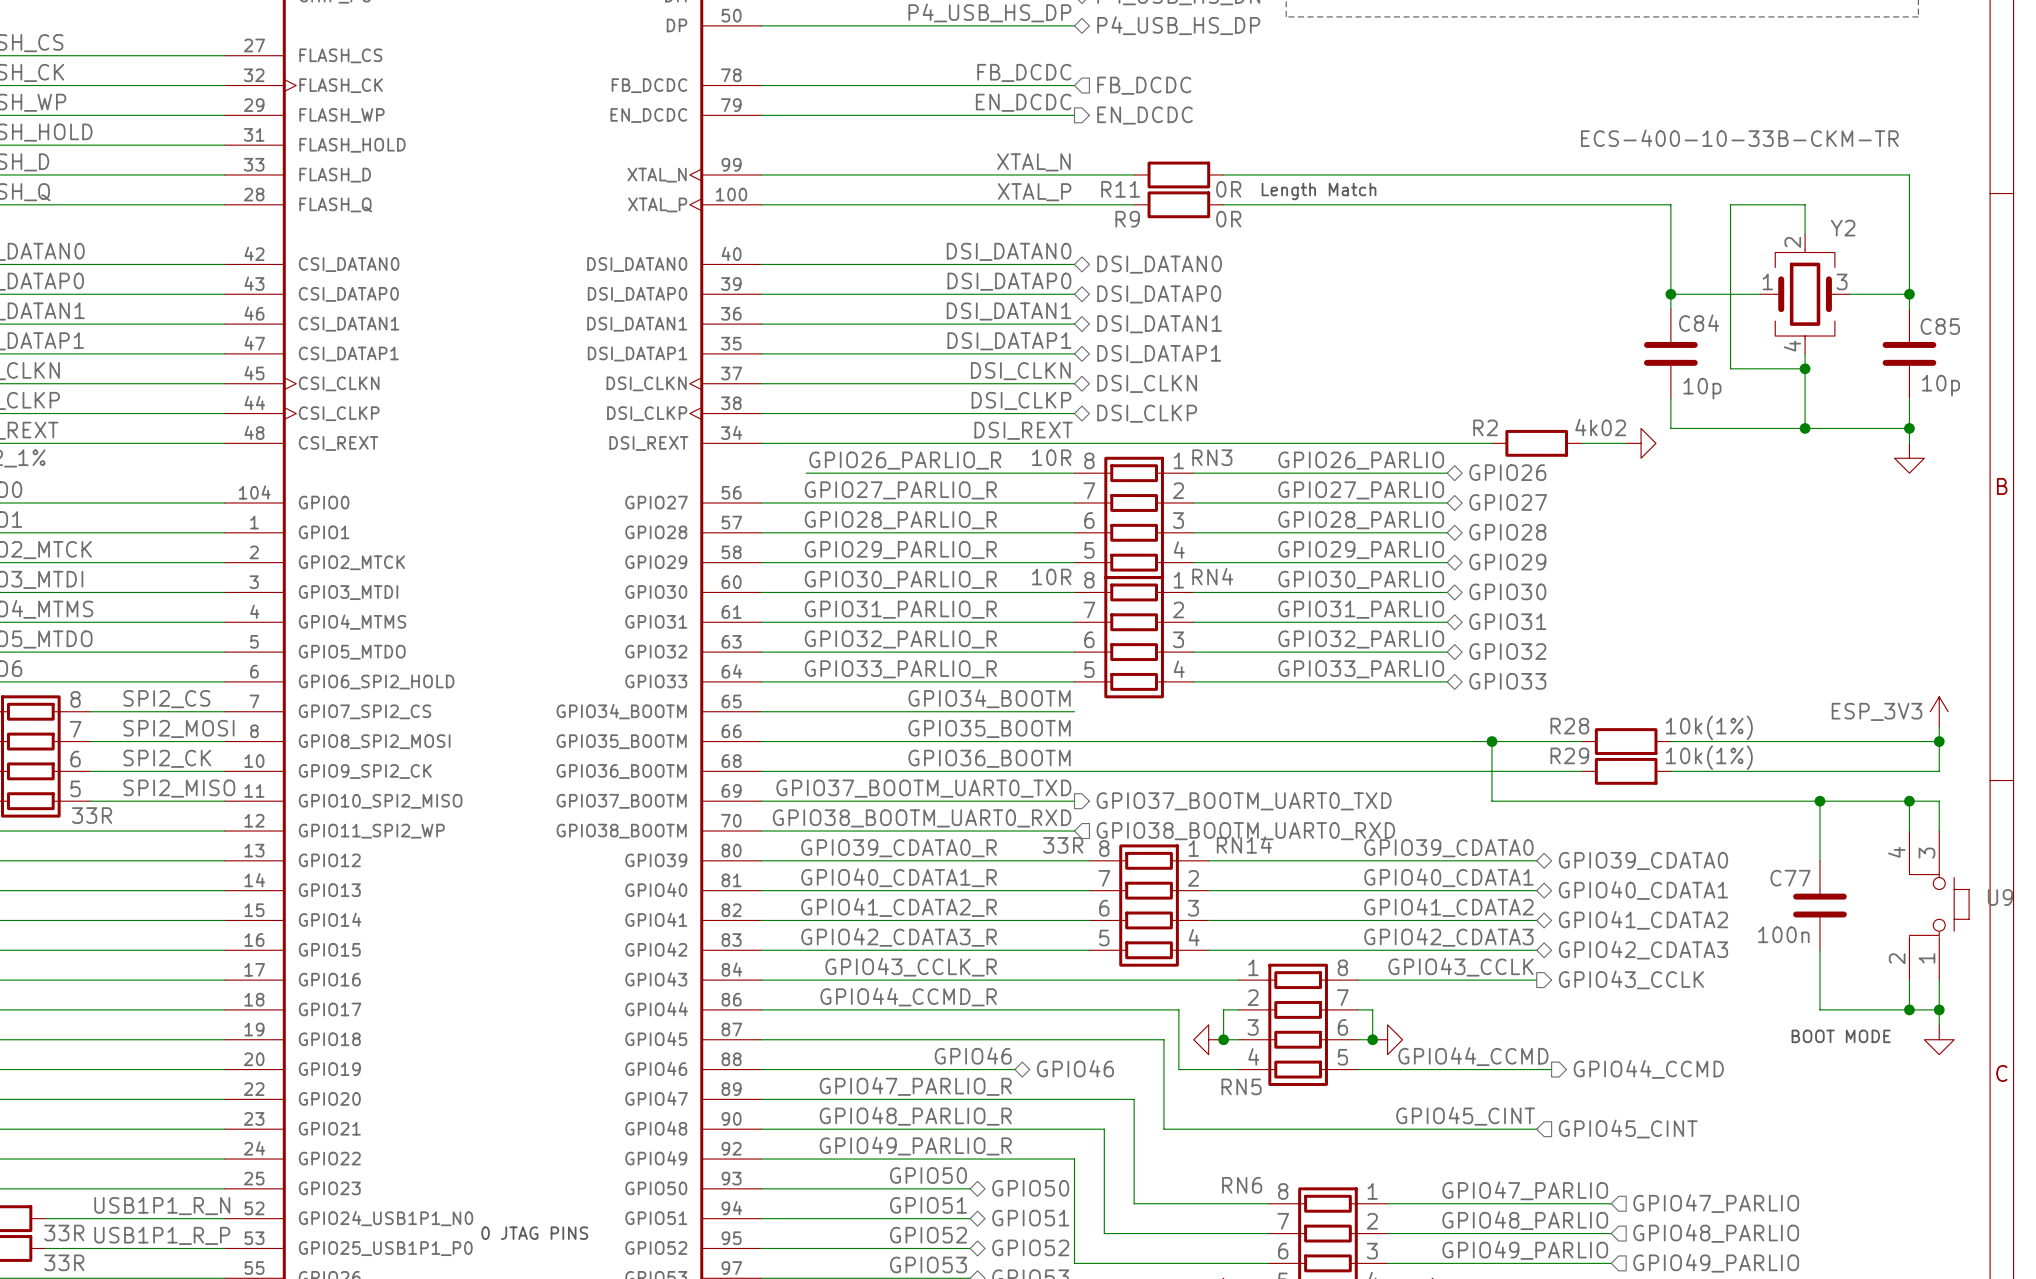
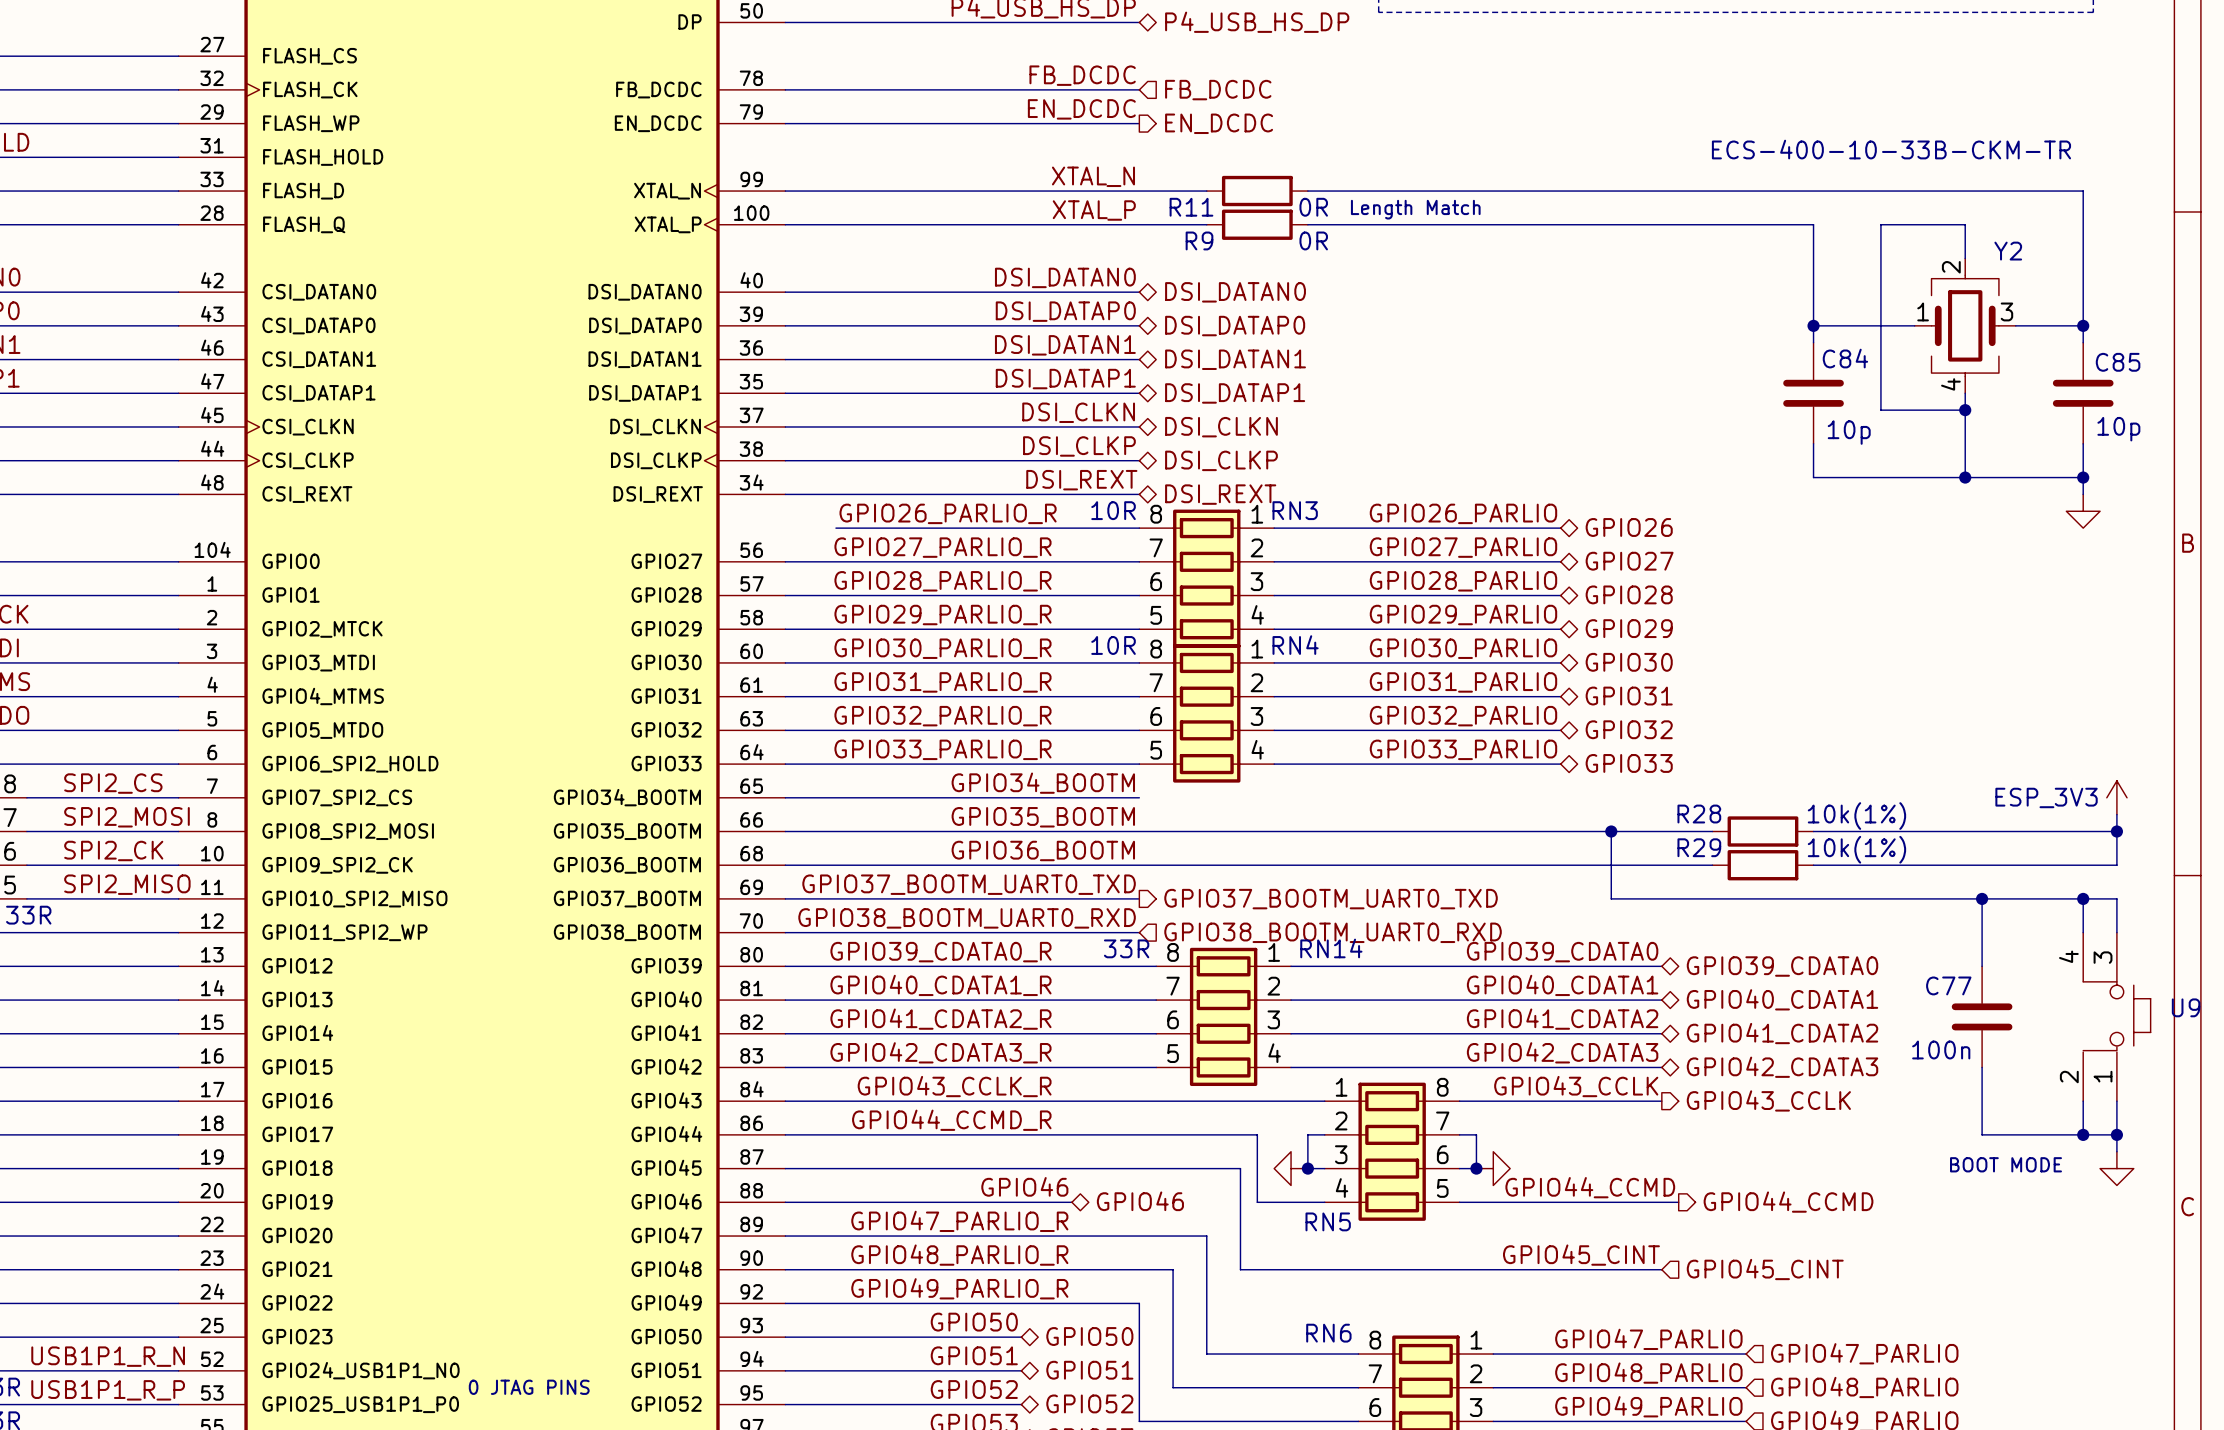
wire: (1074, 443) (1491, 443) -> none
hierarchical label: none -> DSI_REXT (1220, 494)
R2: 4k02 (1536, 443) -> none
wire: (1581, 443) (1626, 443) -> none
power symbol: (1641, 443) -> none

